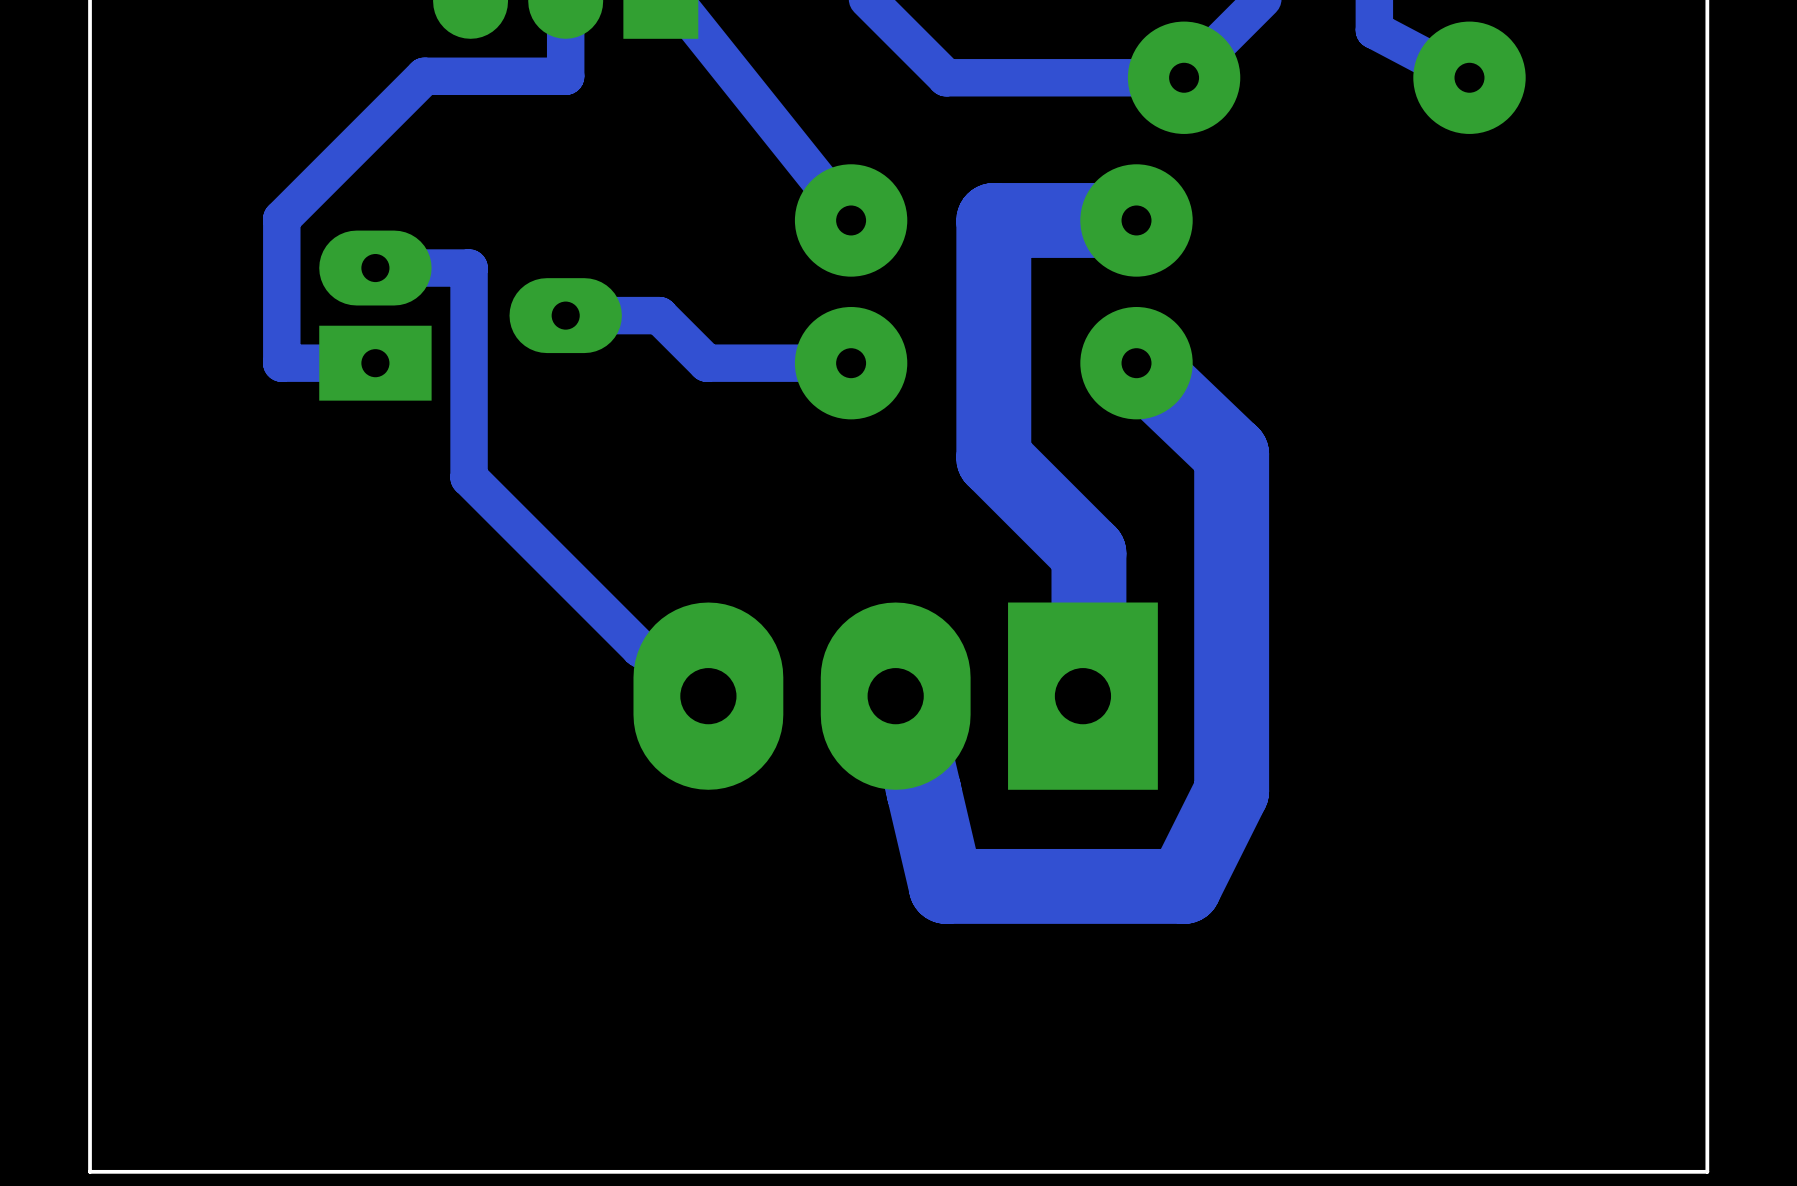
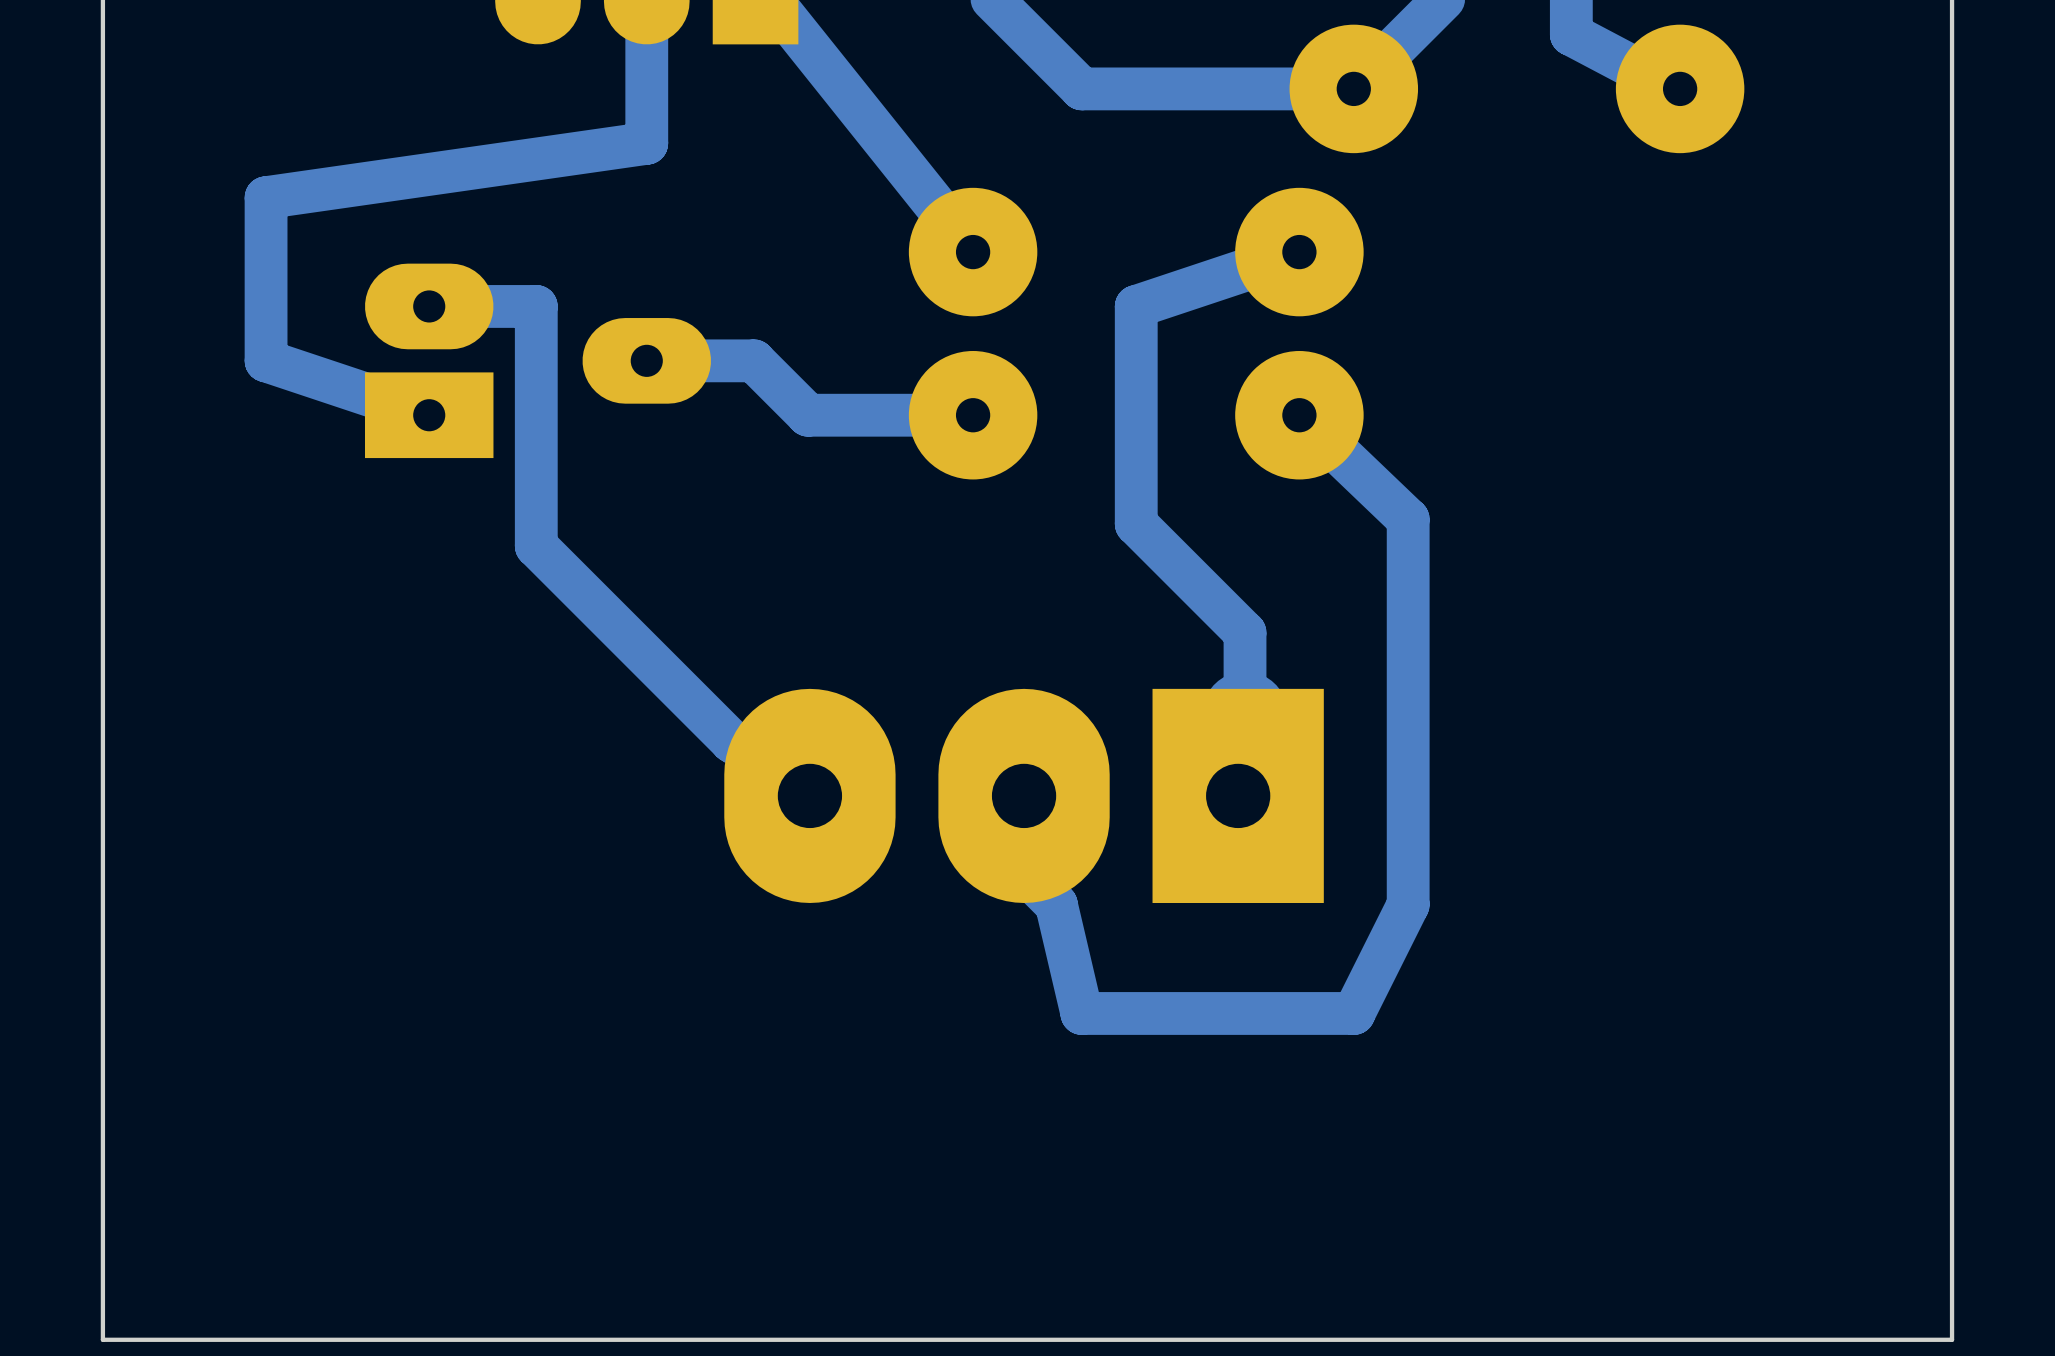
bottom track: (565, 76) (424, 76) (281, 218) (281, 363) (375, 363) -> (646, 87) (646, 143) (266, 197) (266, 360) (429, 415)
bottom track: (1136, 220) (993, 220) (993, 268) -> (1299, 252) (1136, 306)
bottom track width: thick (993, 268) (993, 458) (1088, 553) (1088, 624) -> thin (1136, 306) (1136, 524) (1245, 632) (1245, 714)
bottom track width: thick (1136, 363) (1231, 454) (1231, 791) (1184, 886) (946, 886) (923, 791) -> thin (1299, 415) (1408, 519) (1408, 904) (1353, 1013) (1081, 1013) (1056, 904)

